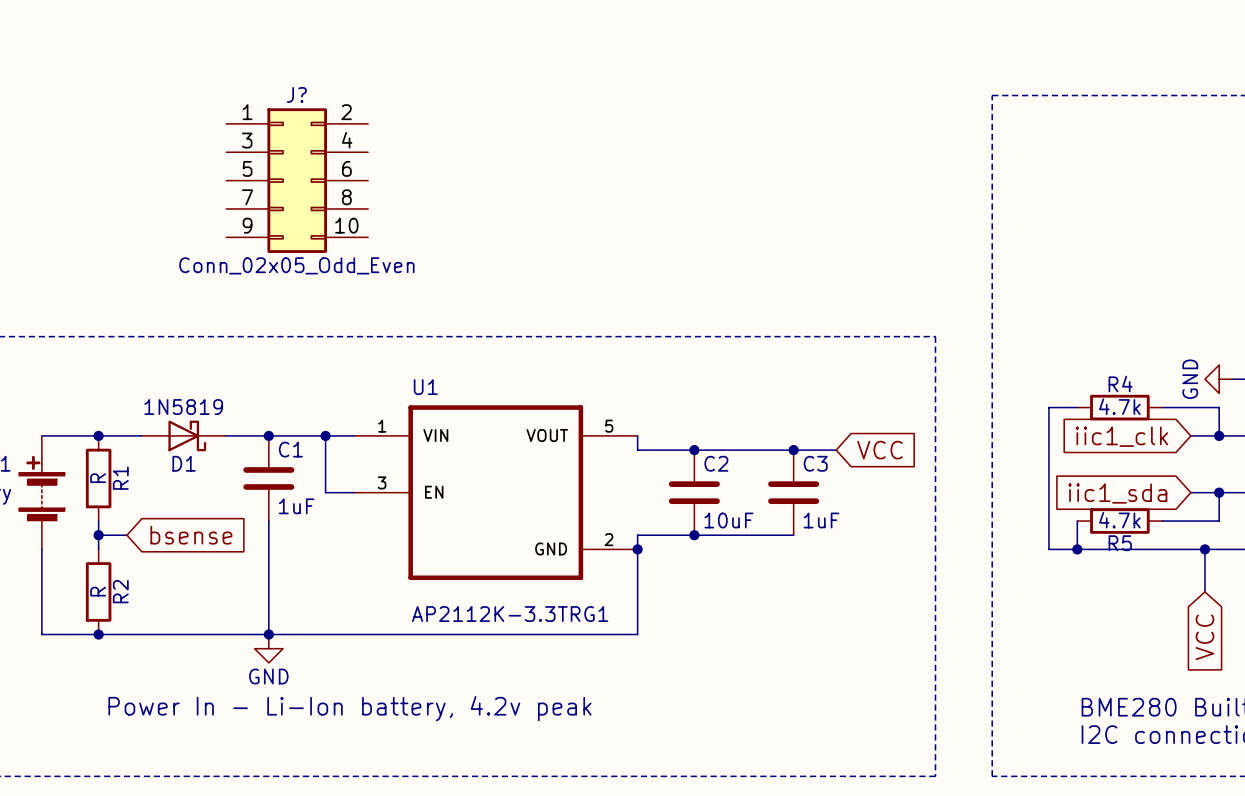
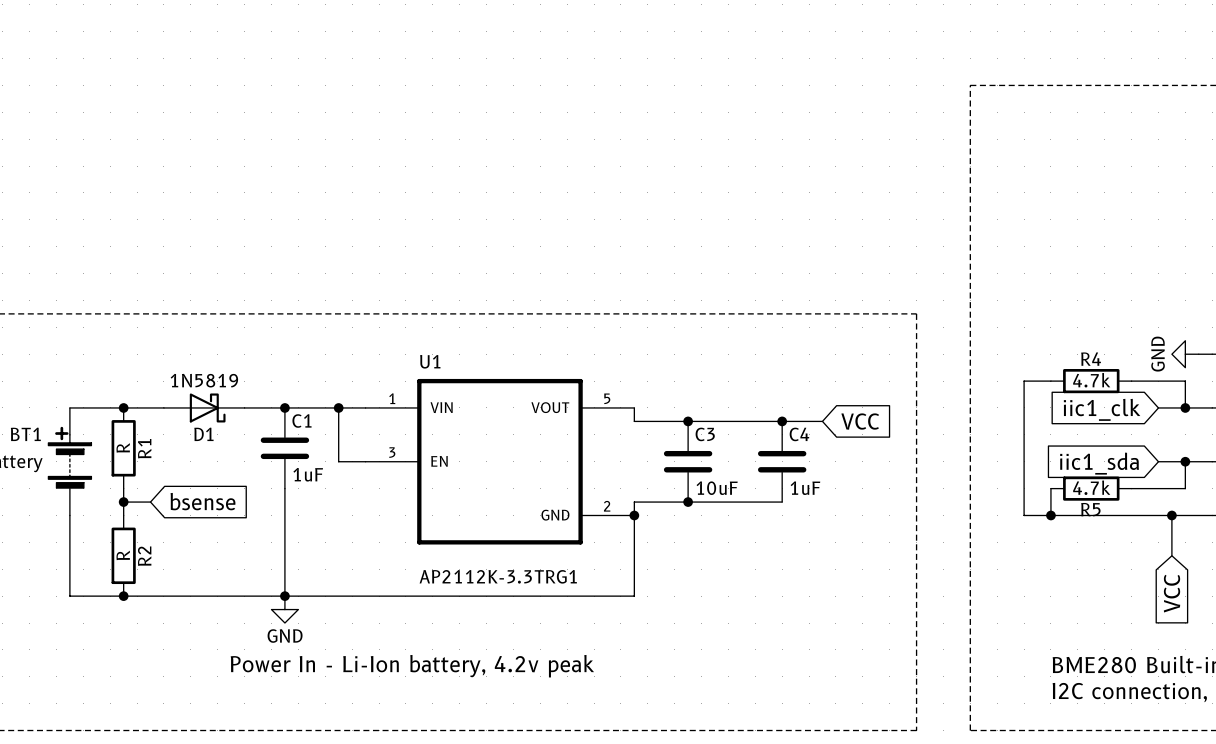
J?: Conn_02x05_Odd_Even (297, 180) -> none
C2 name: C2 (716, 463) -> C3 (705, 434)
C3 name: C3 (815, 463) -> C4 (799, 434)

